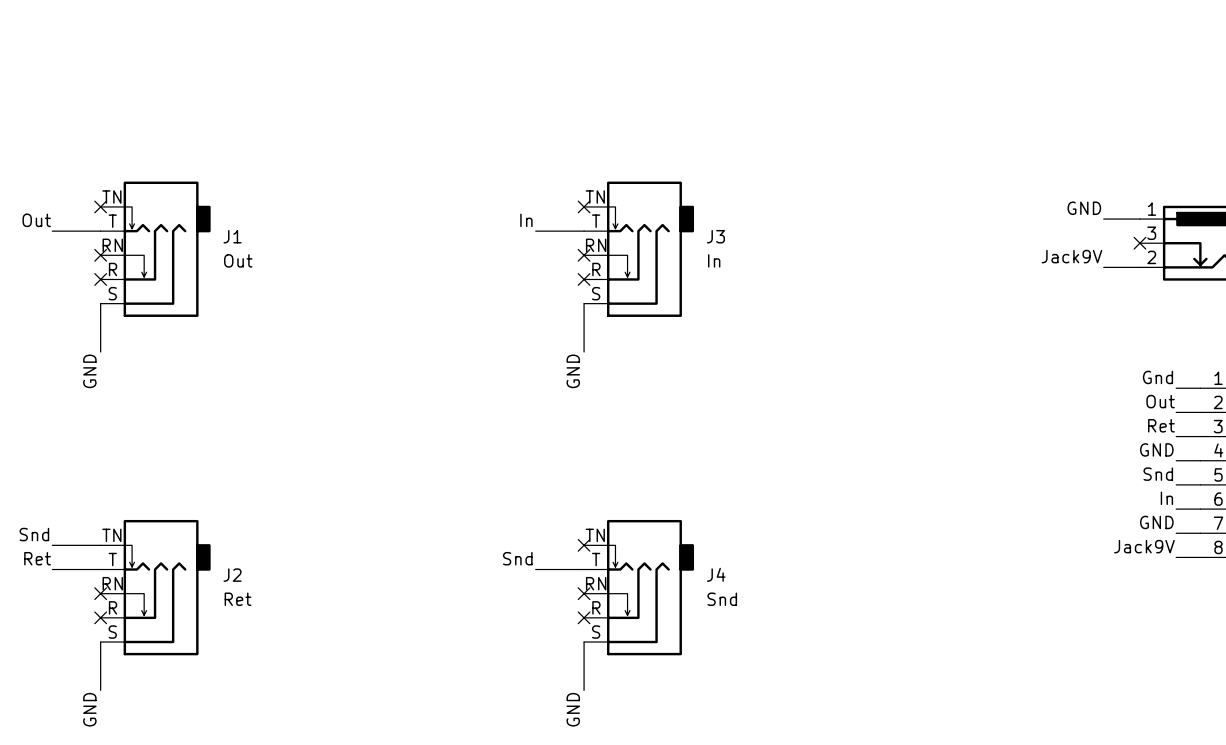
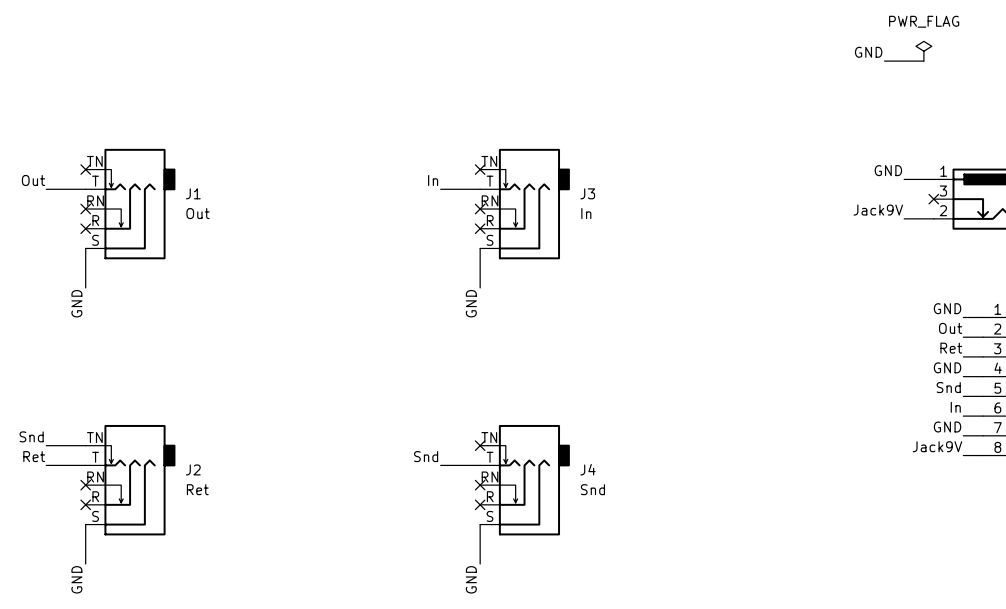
power symbol: none -> PWR_FLAG (923, 51)
label: none -> GND (868, 52)
wire: none -> (884, 61) (923, 61)
label: Gnd (1157, 377) -> GND (947, 308)

